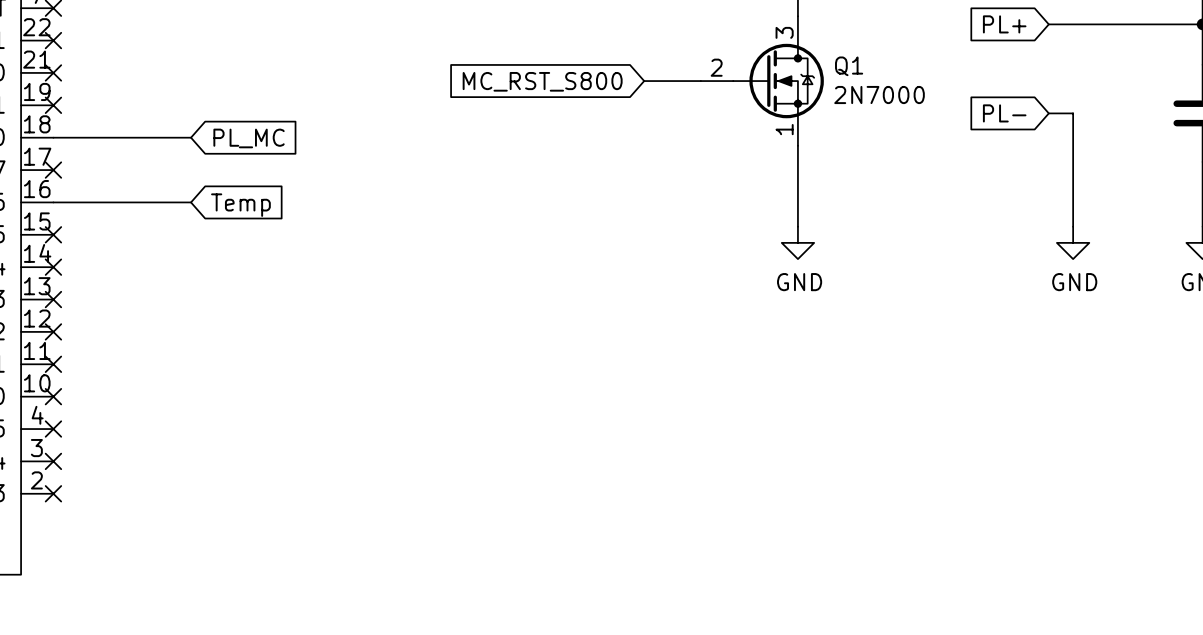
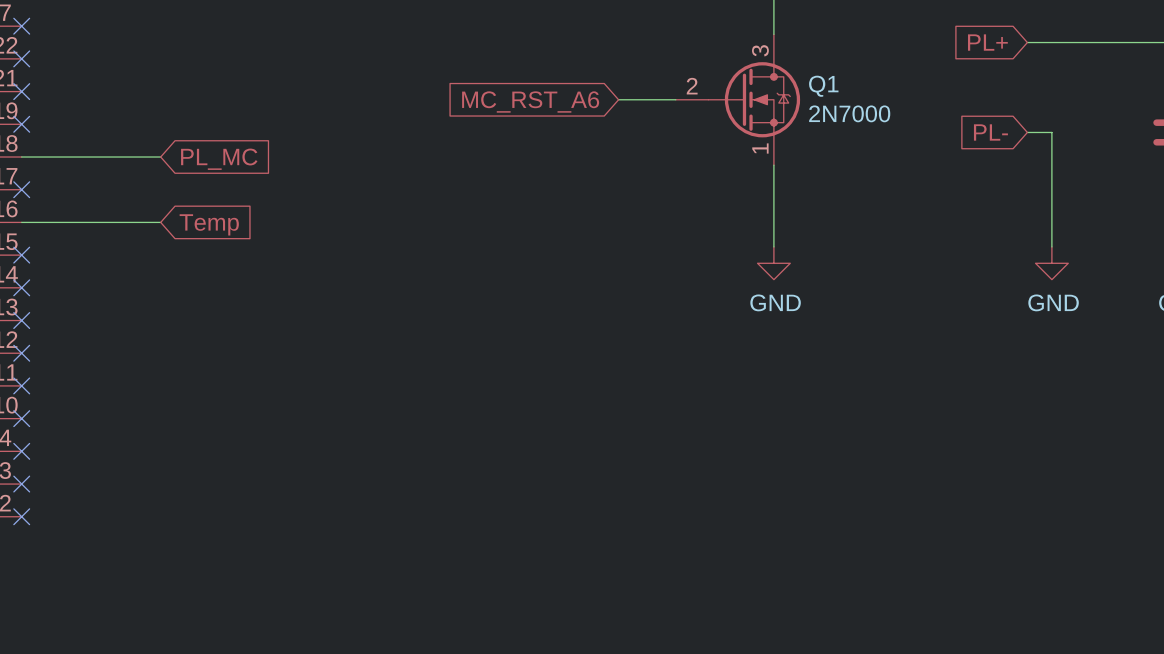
global label: MC_RST_S800 (542, 81) -> MC_RST_A6 (530, 102)

